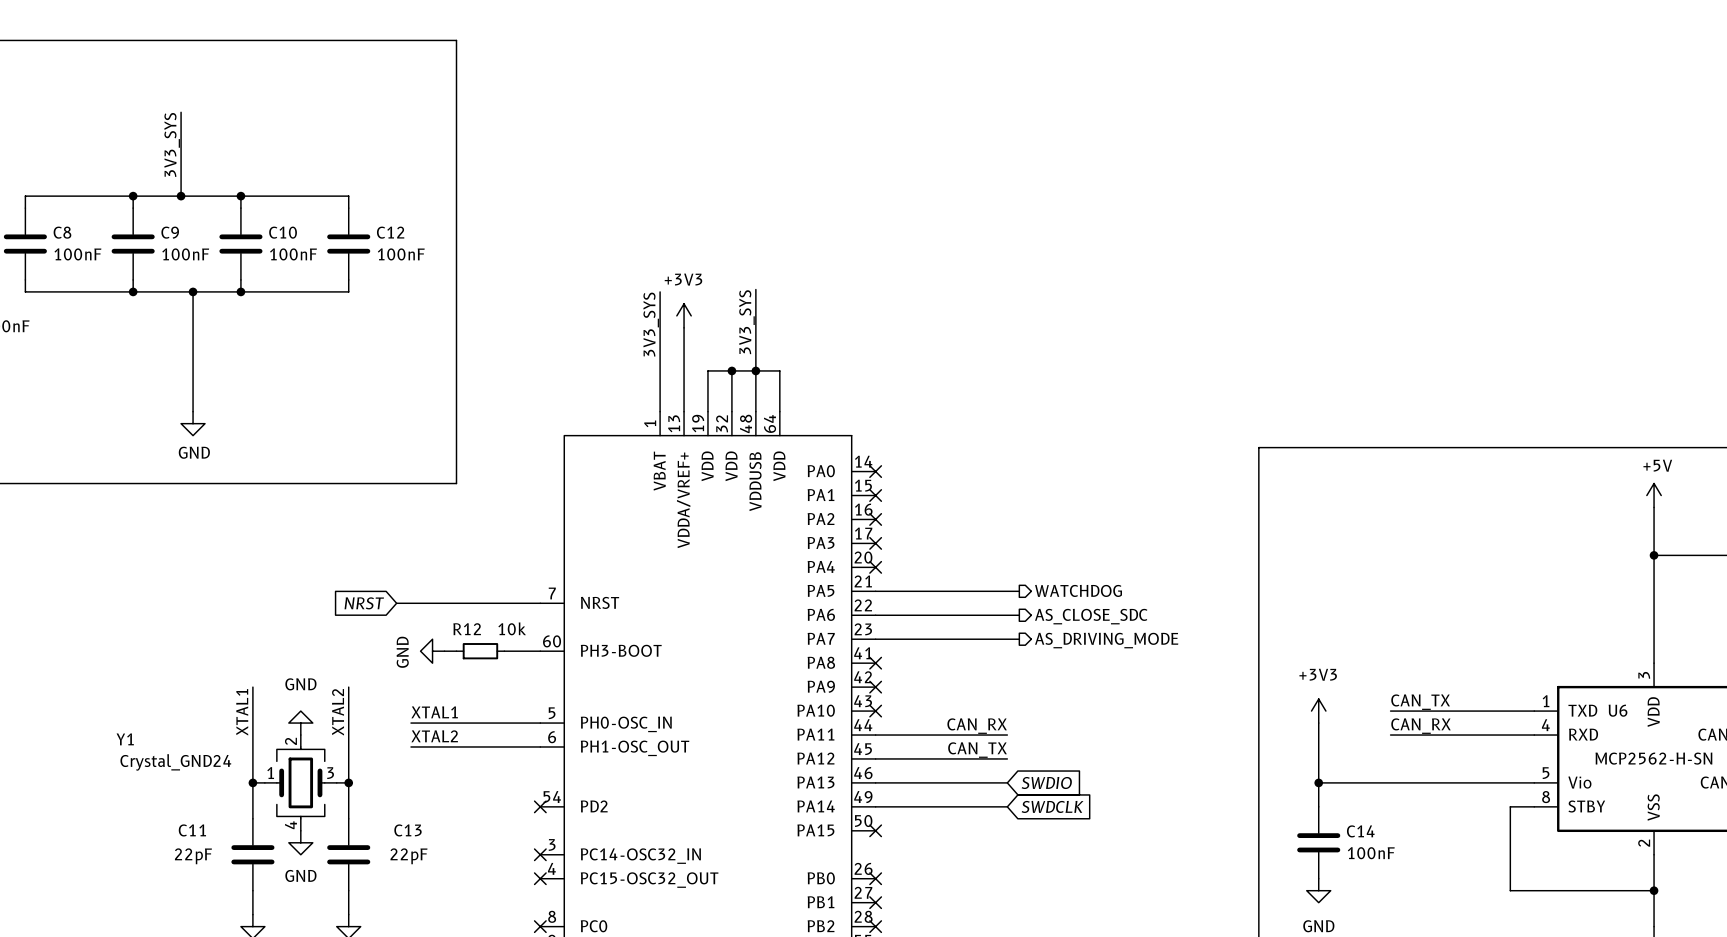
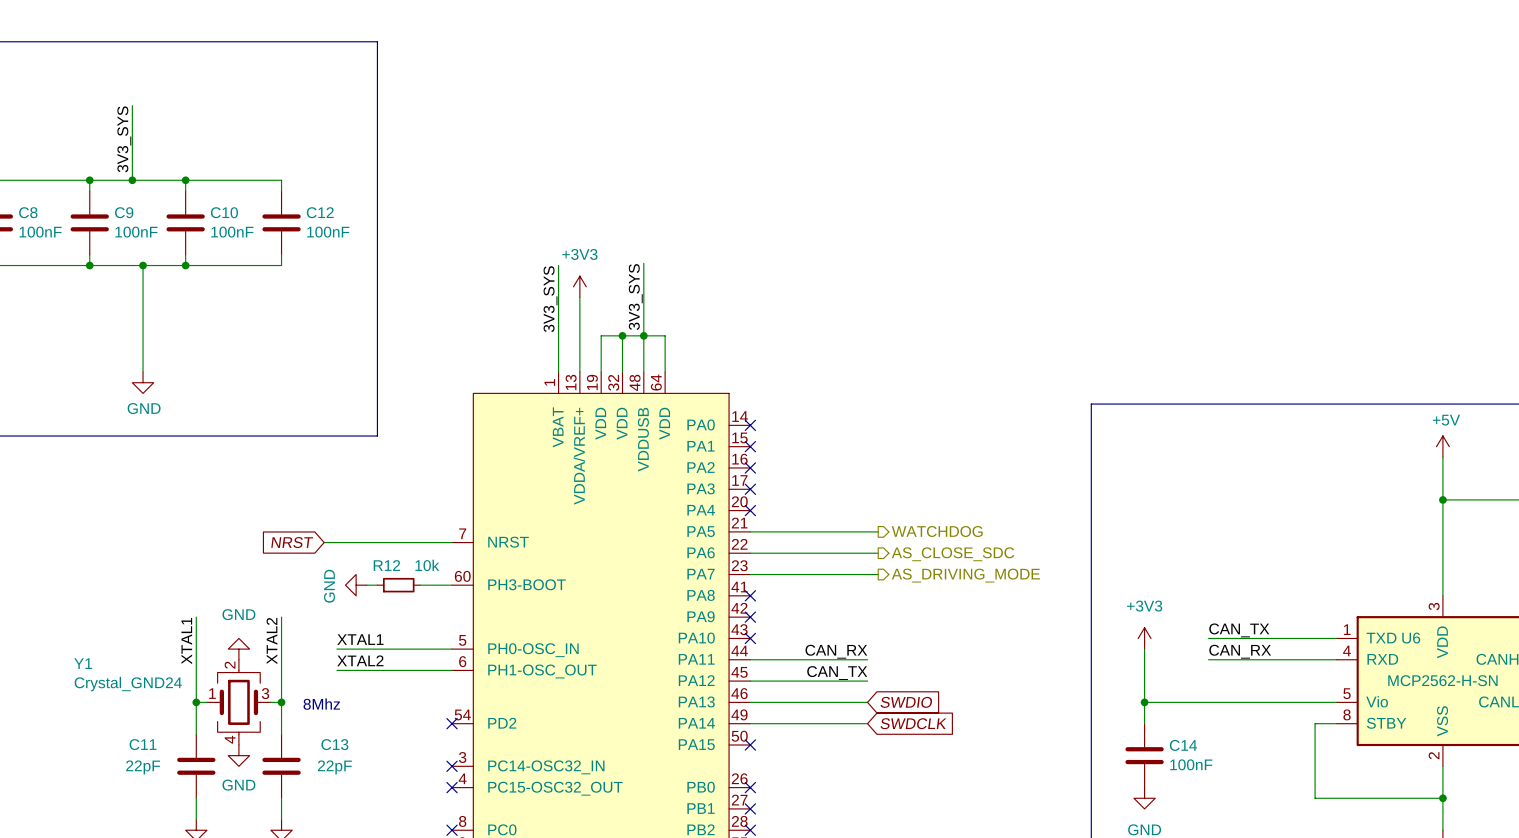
text: none -> 8Mhz (321, 704)

